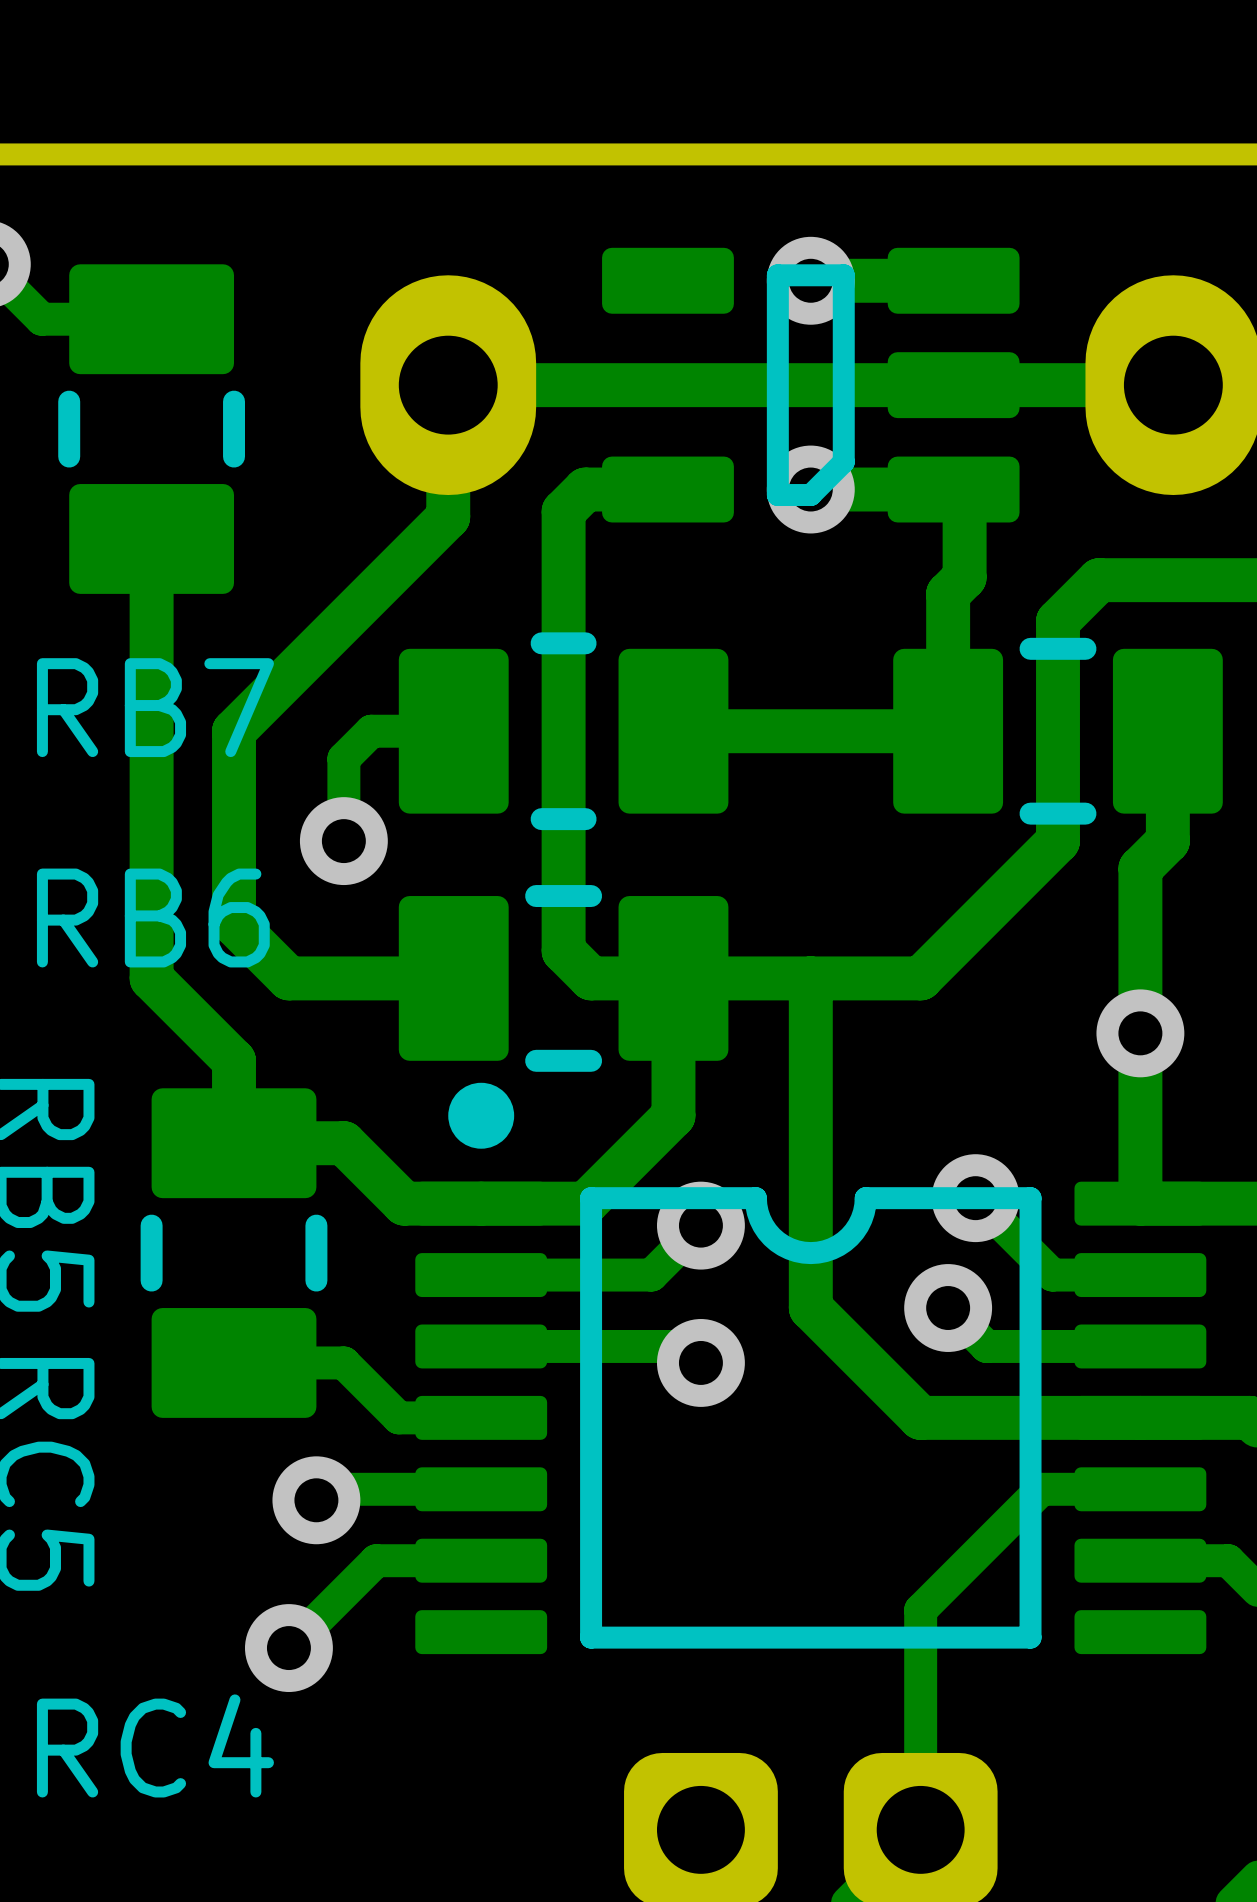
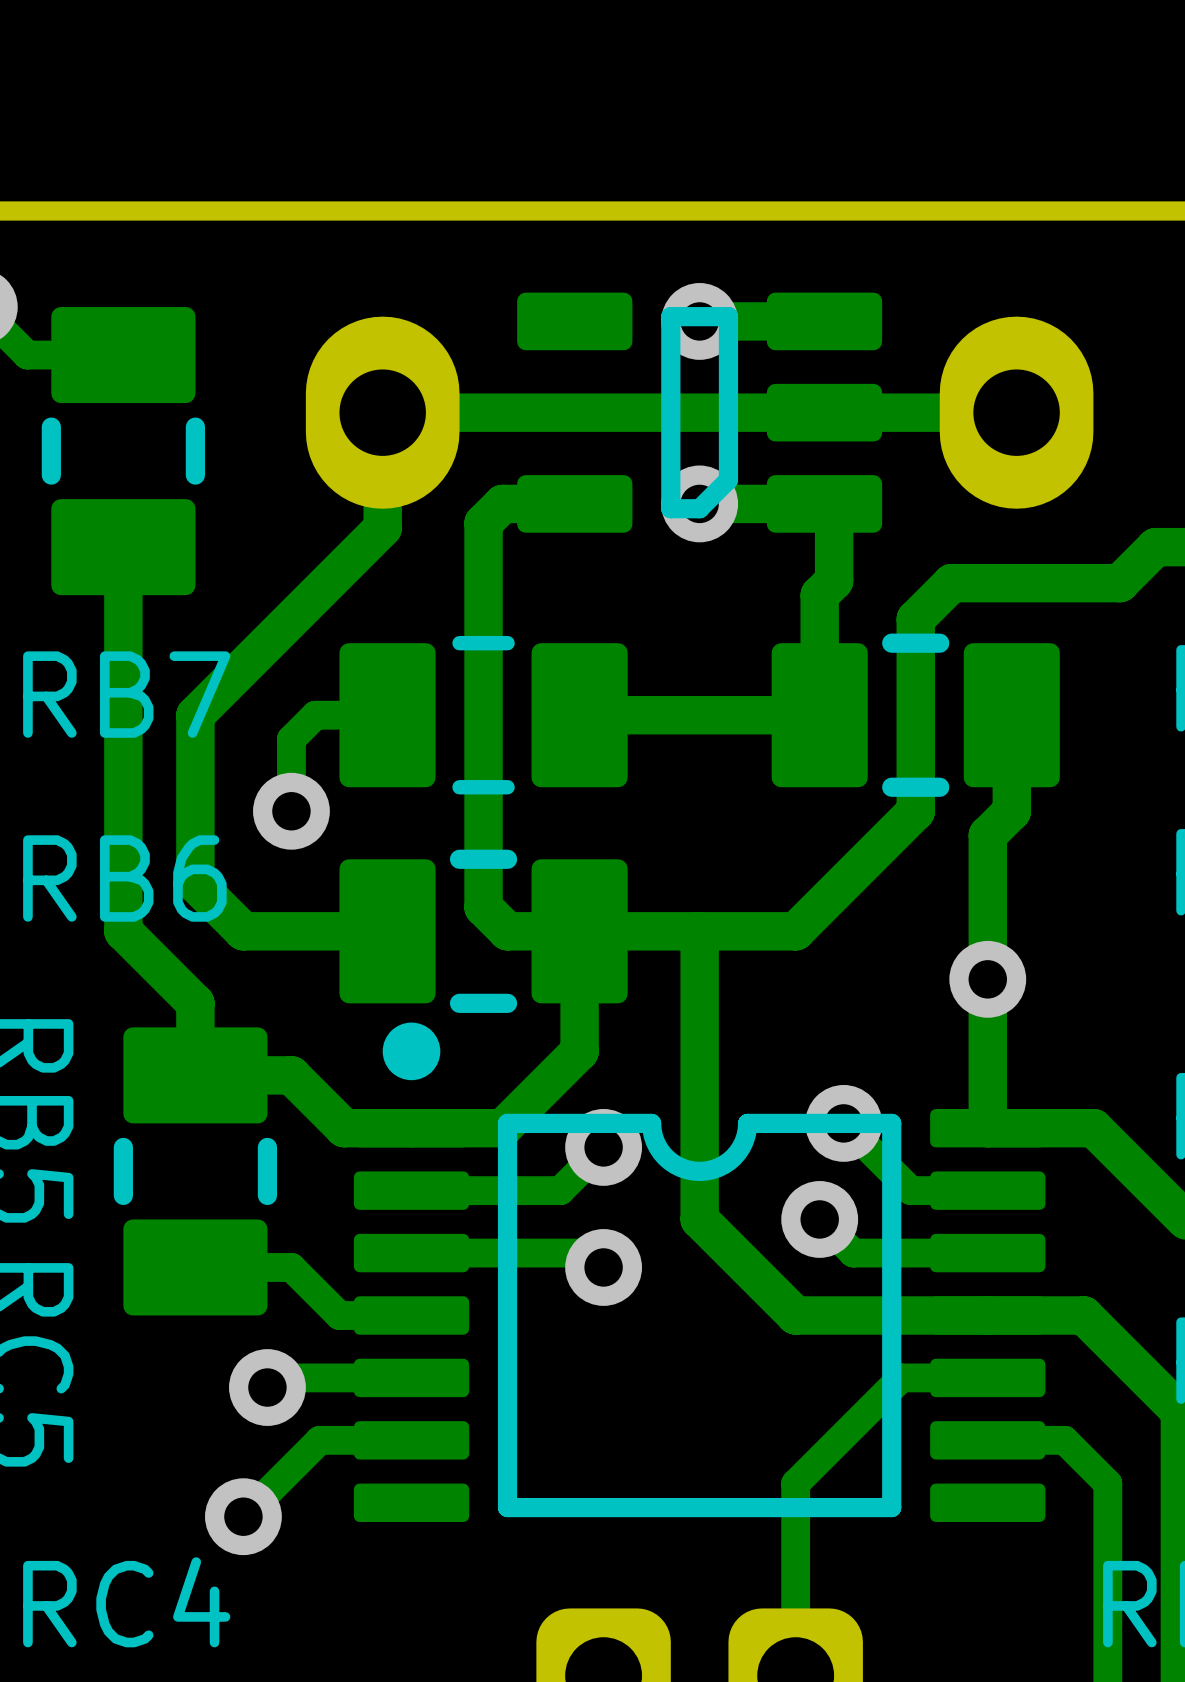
part footprint: [398, 632, 729, 831] -> [339, 635, 628, 795]

